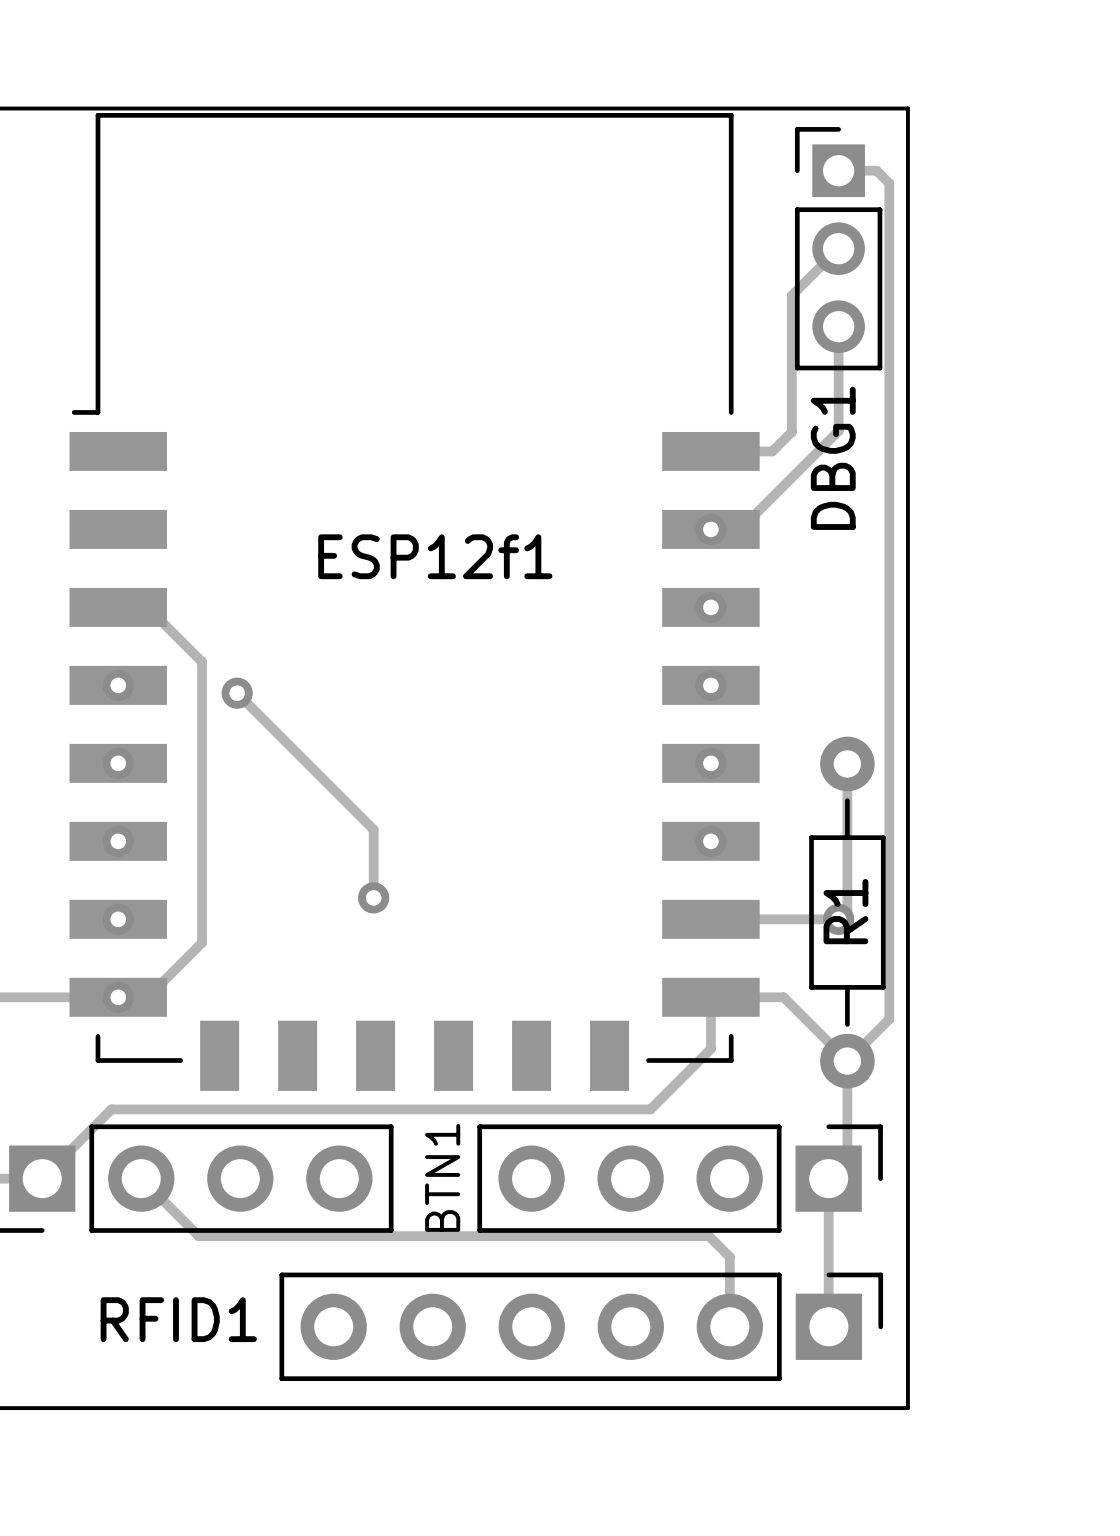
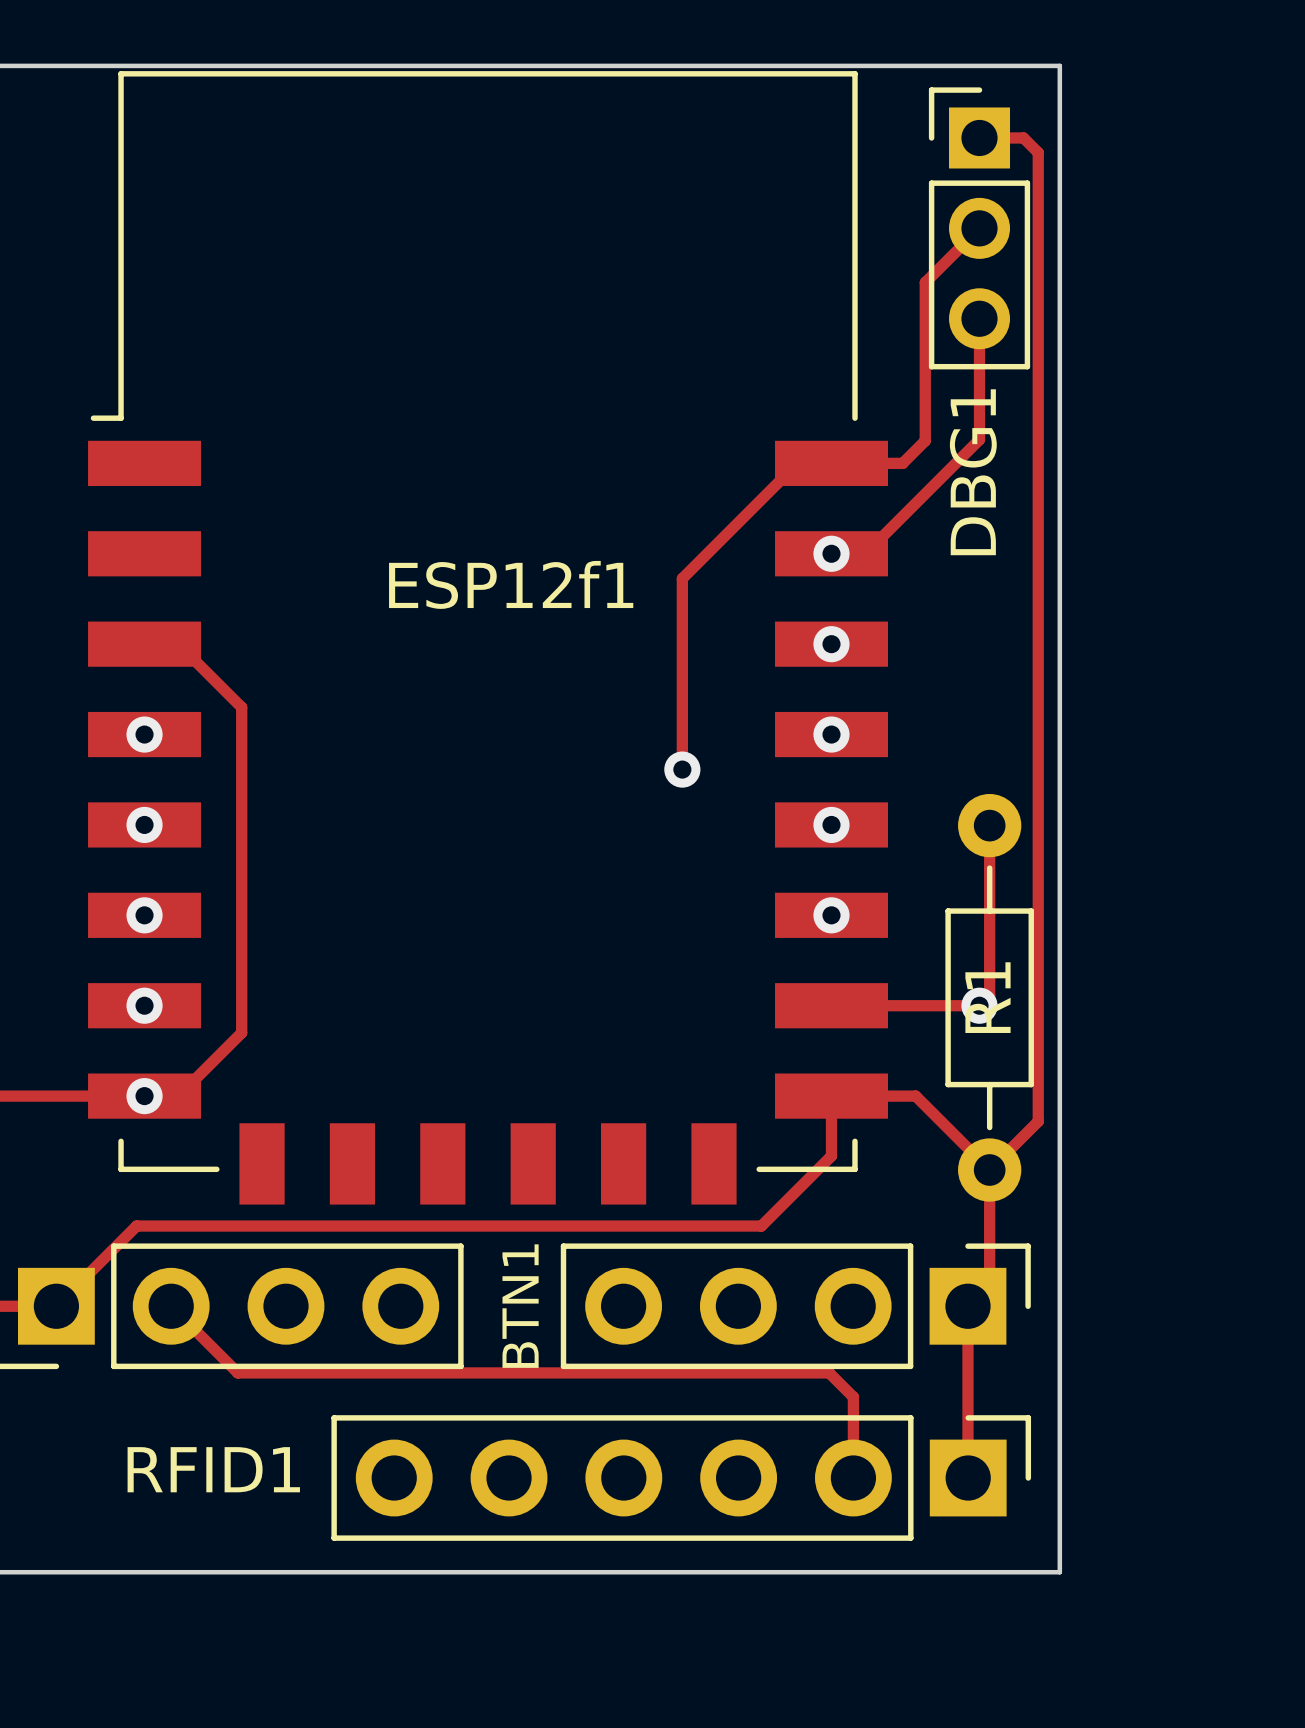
track: none -> (797, 463) (682, 578) (682, 769)
track: (237, 693) (373, 829) (373, 897) -> none
via: (237, 693) -> none
via: none -> (682, 769)
via: (373, 897) -> none

